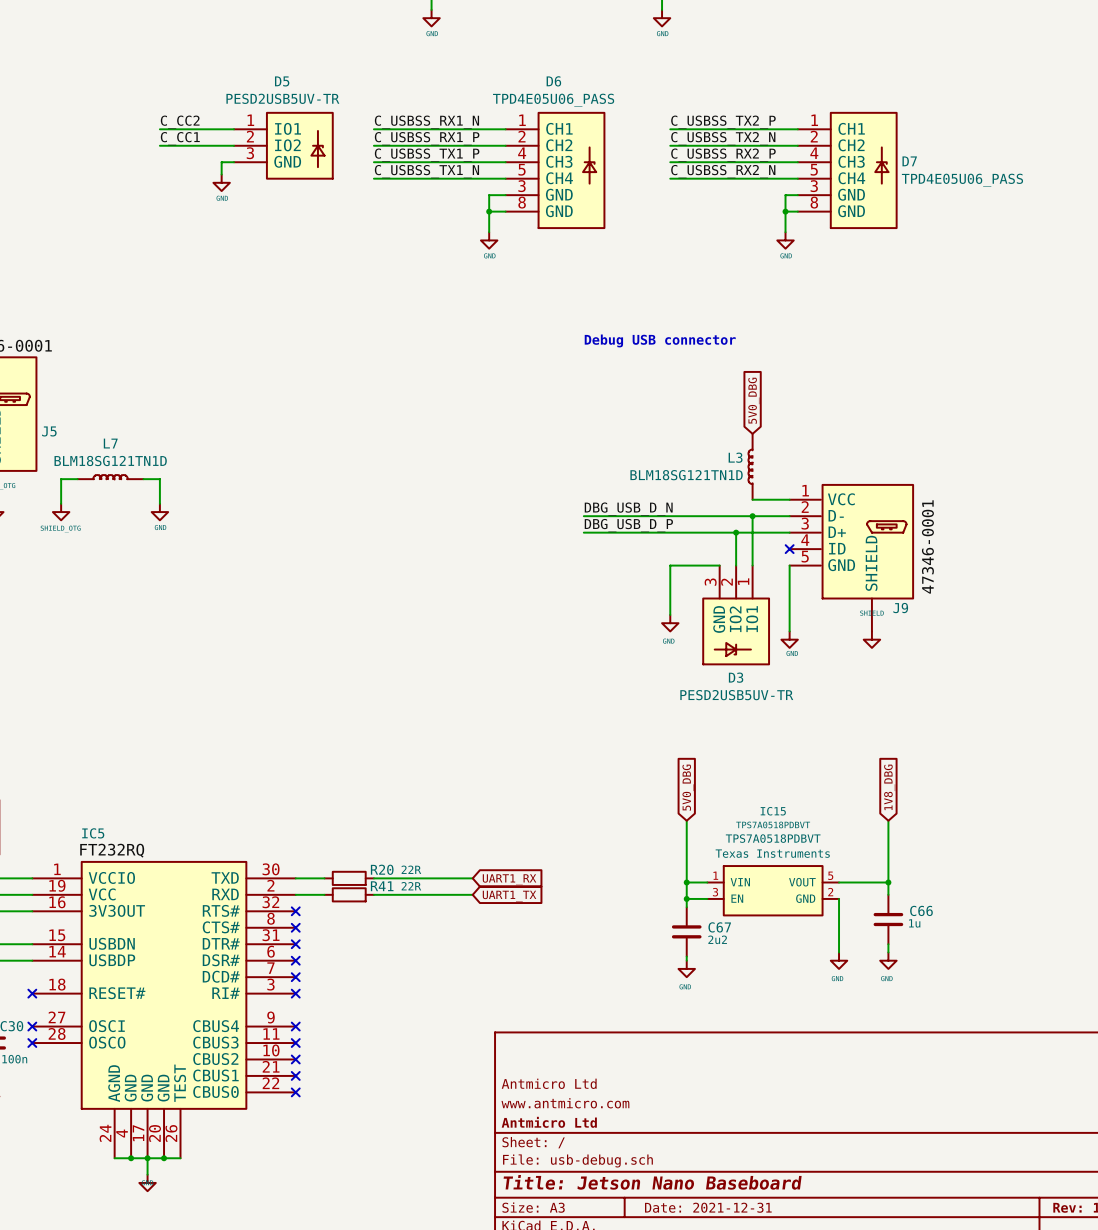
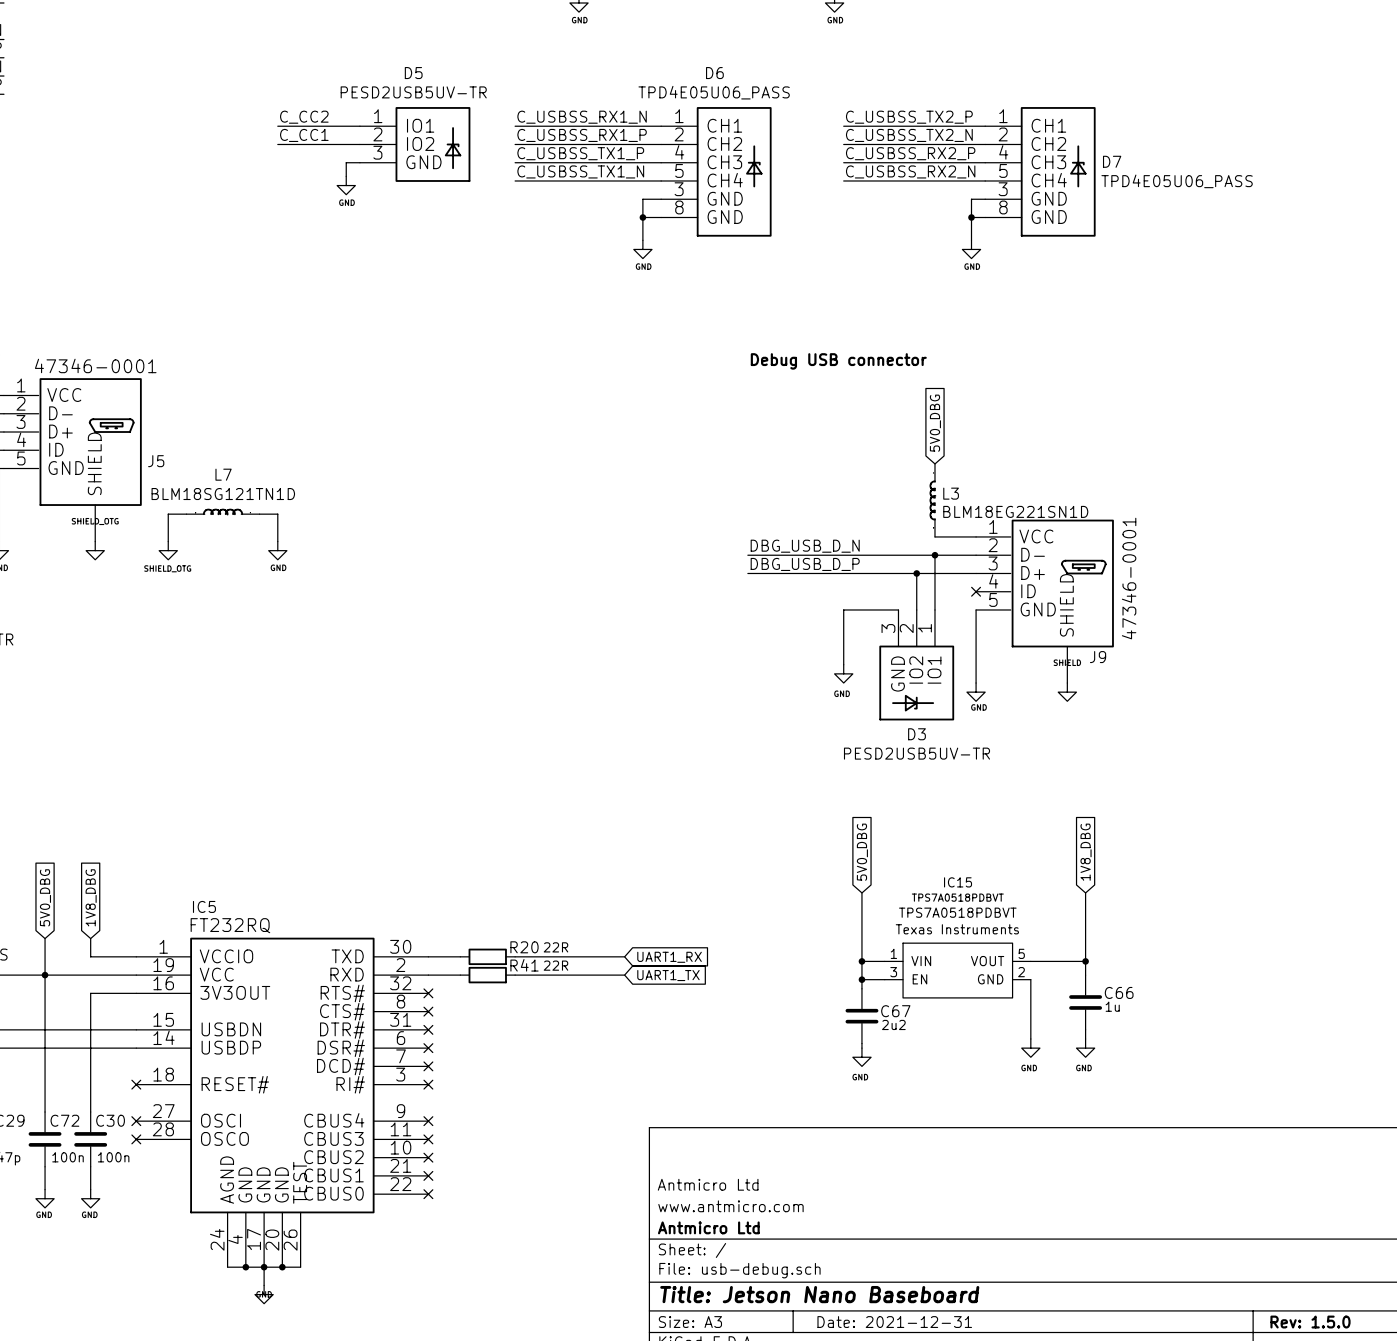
L3 name position: L3 (735, 457) -> L3 (951, 493)
L3 value: BLM18SG121TN1D (686, 475) -> BLM18EG221SN1D (1015, 511)

